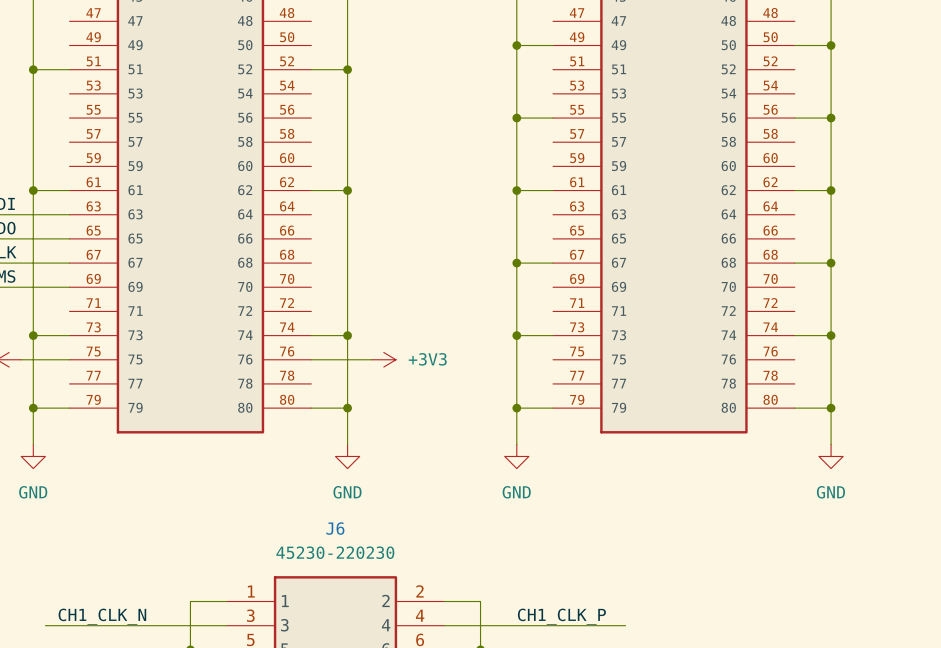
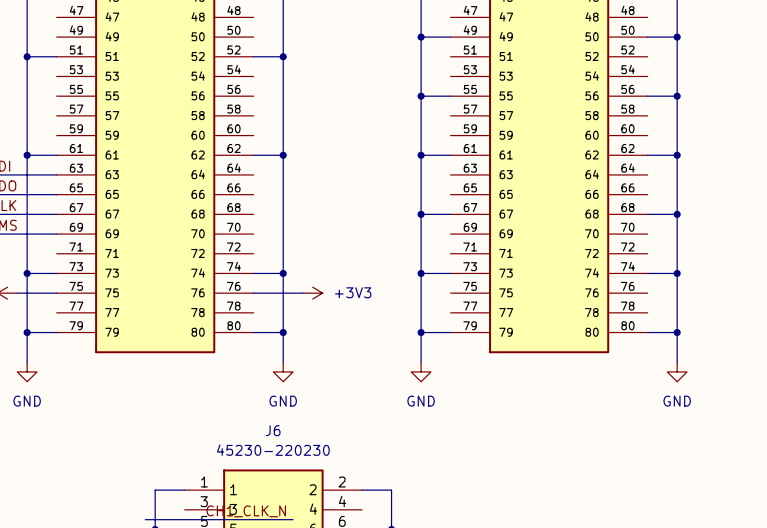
label position: CH1_CLK_N (102, 616) -> CH1_CLK_N (246, 511)
label: CH1_CLK_P (561, 616) -> none
wire: (45, 625) (226, 625) -> (145, 519) (293, 519)
wire: (444, 625) (625, 625) -> none

